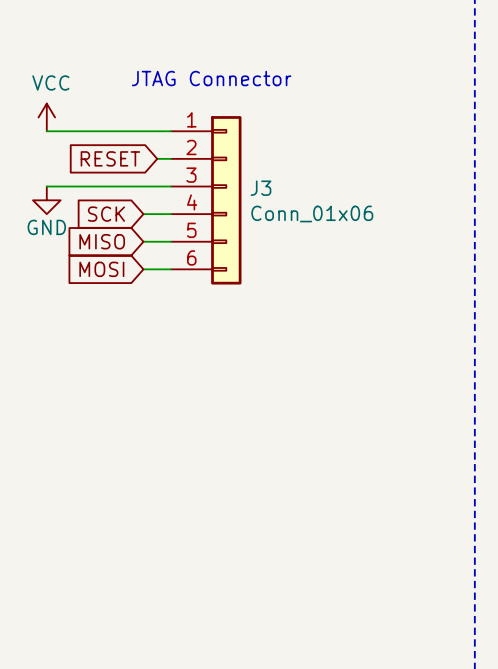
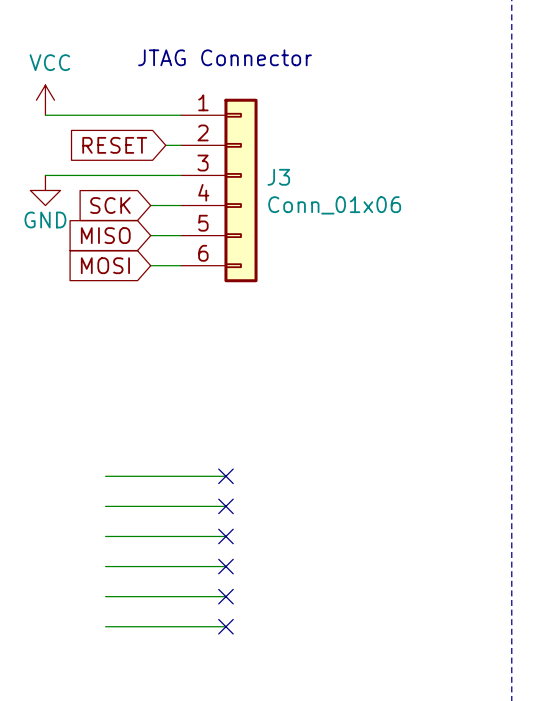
wire: none -> (105, 476) (225, 476)
no-connect mark: none -> (225, 476)
wire: none -> (105, 506) (225, 506)
no-connect mark: none -> (225, 506)
wire: none -> (105, 536) (225, 536)
no-connect mark: none -> (225, 536)
wire: none -> (105, 566) (225, 566)
no-connect mark: none -> (225, 566)
wire: none -> (105, 596) (225, 596)
no-connect mark: none -> (225, 596)
wire: none -> (105, 626) (225, 626)
no-connect mark: none -> (225, 626)

